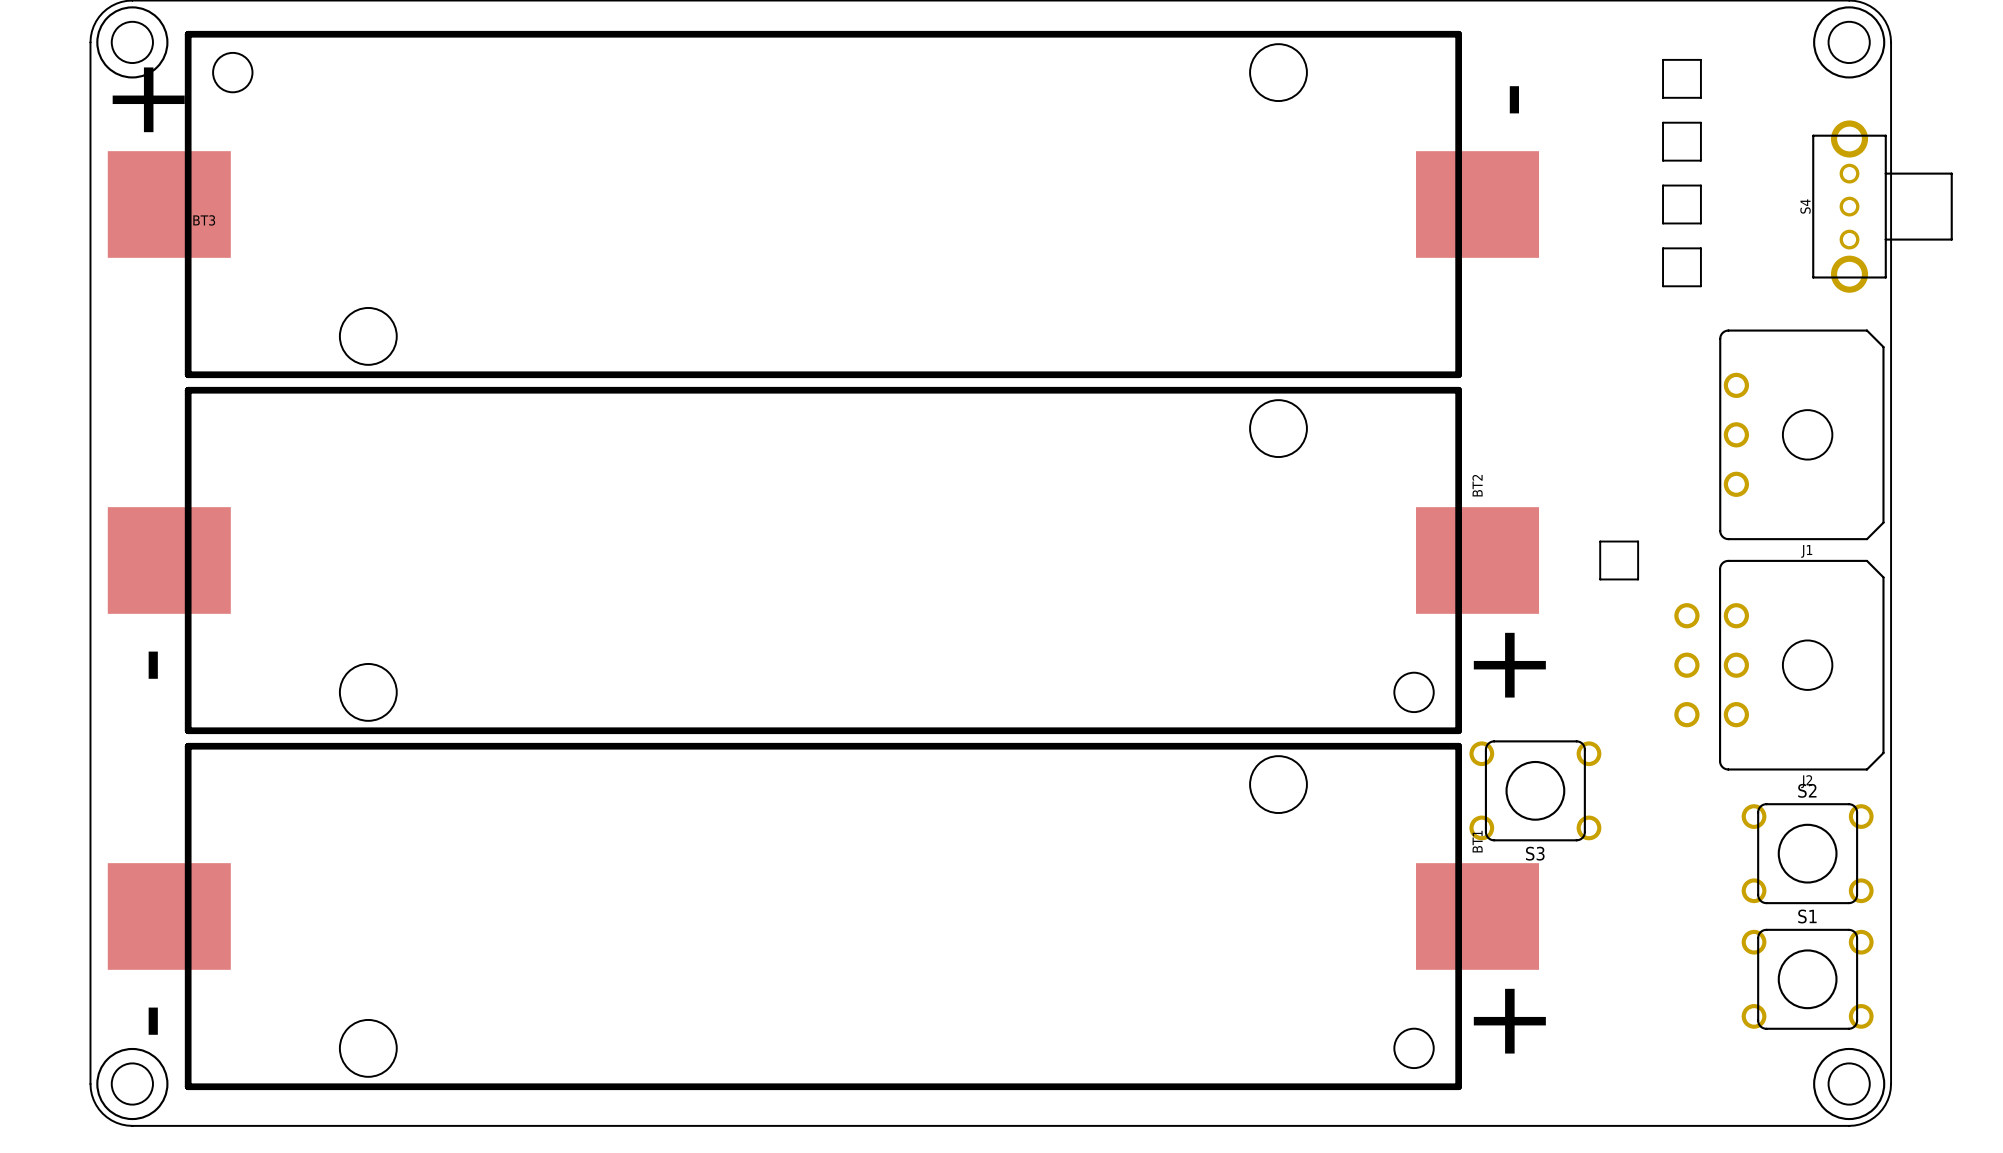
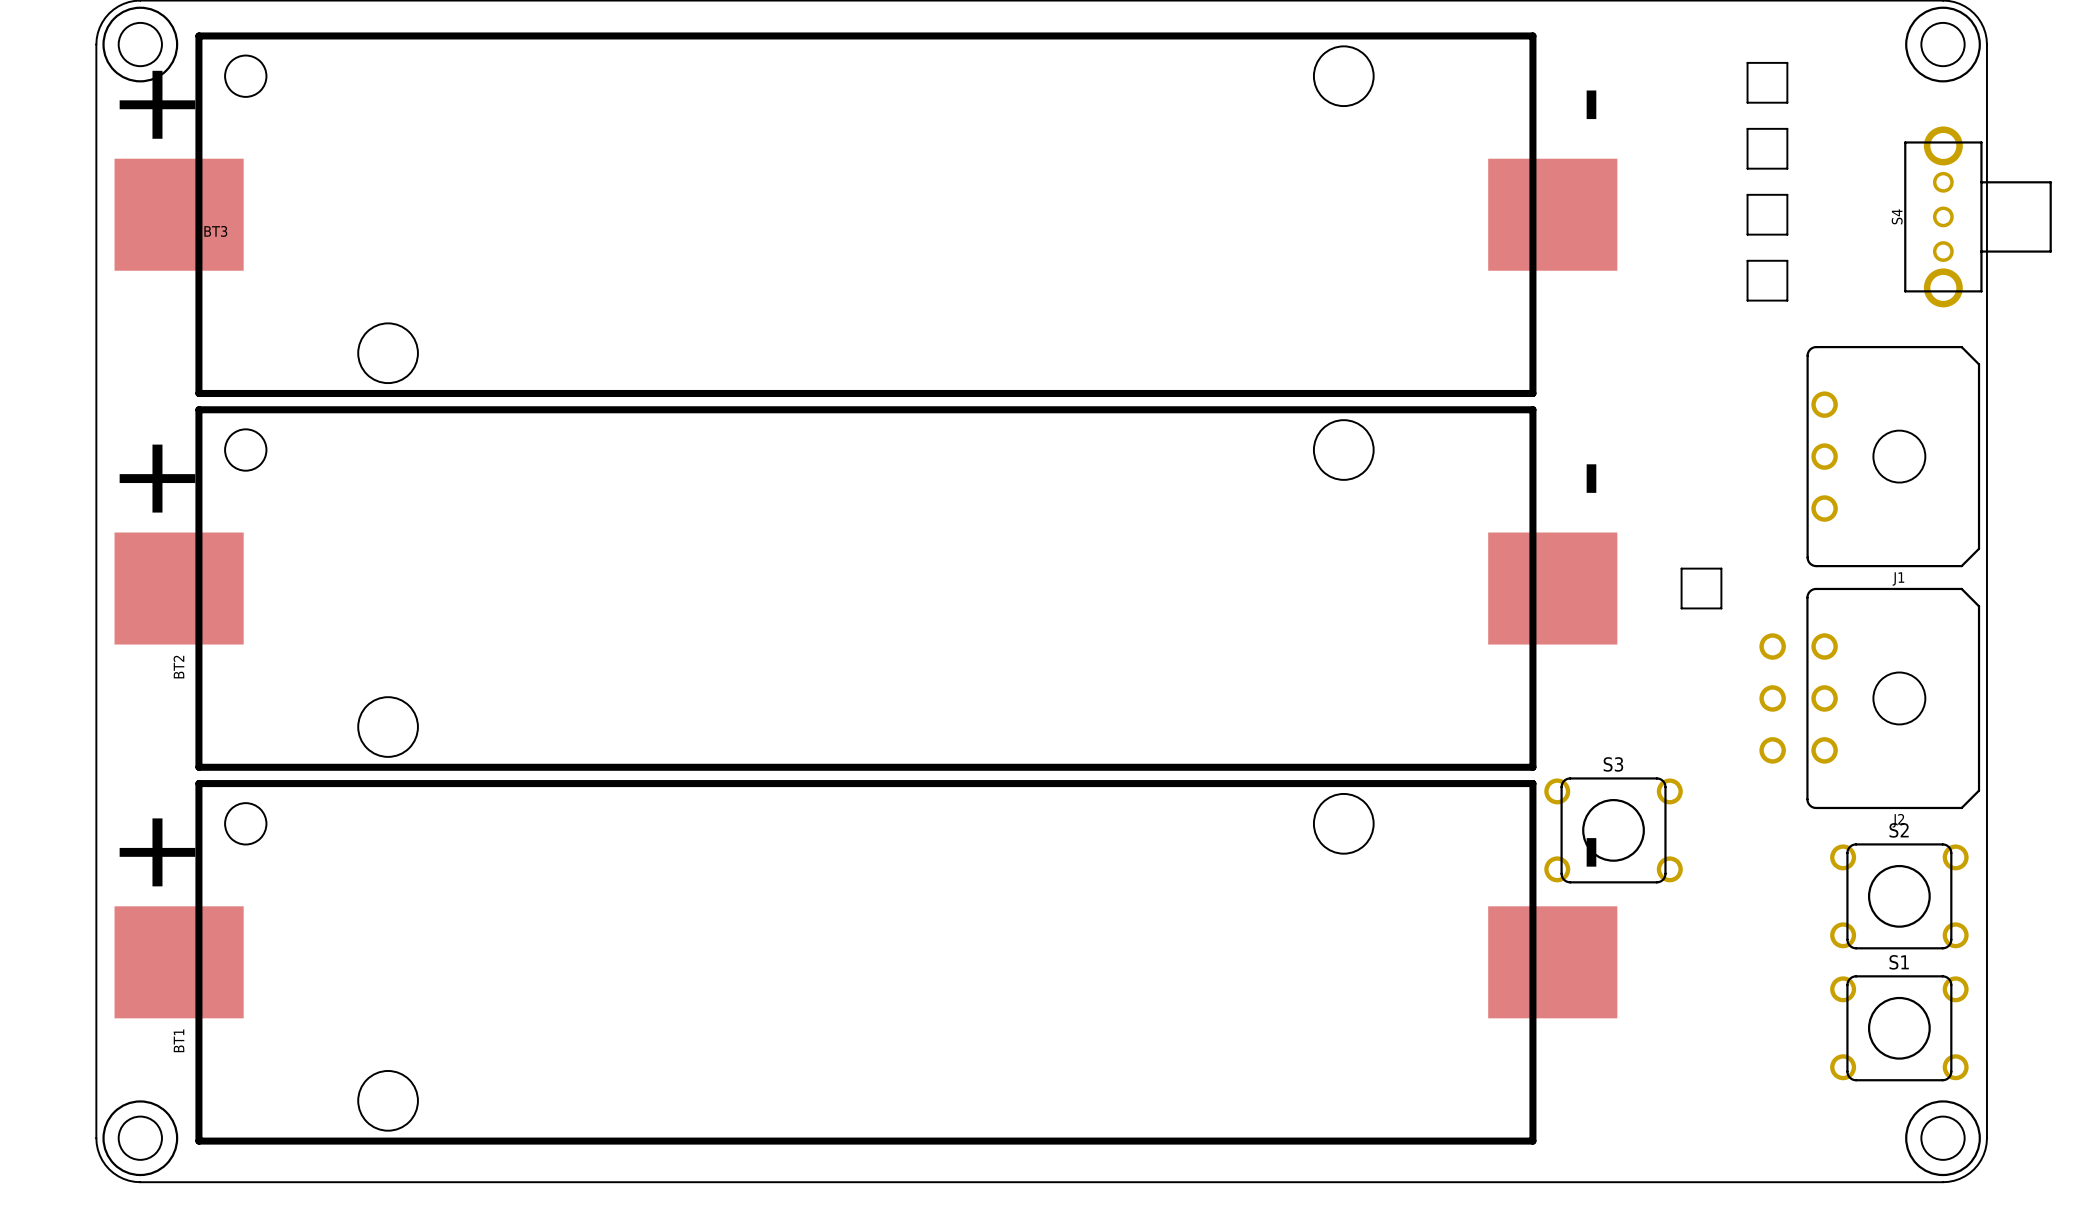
BT2 footprint: [107, 386, 1540, 735] -> [114, 406, 1618, 771]
BT2 name position: BT2 (1477, 485) -> BT2 (178, 667)
BT1 footprint: [107, 742, 1540, 1091] -> [114, 780, 1618, 1145]
BT1 name position: BT1 (1477, 841) -> BT1 (179, 1040)
S3 name position: S3 (1535, 853) -> S3 (1613, 764)

